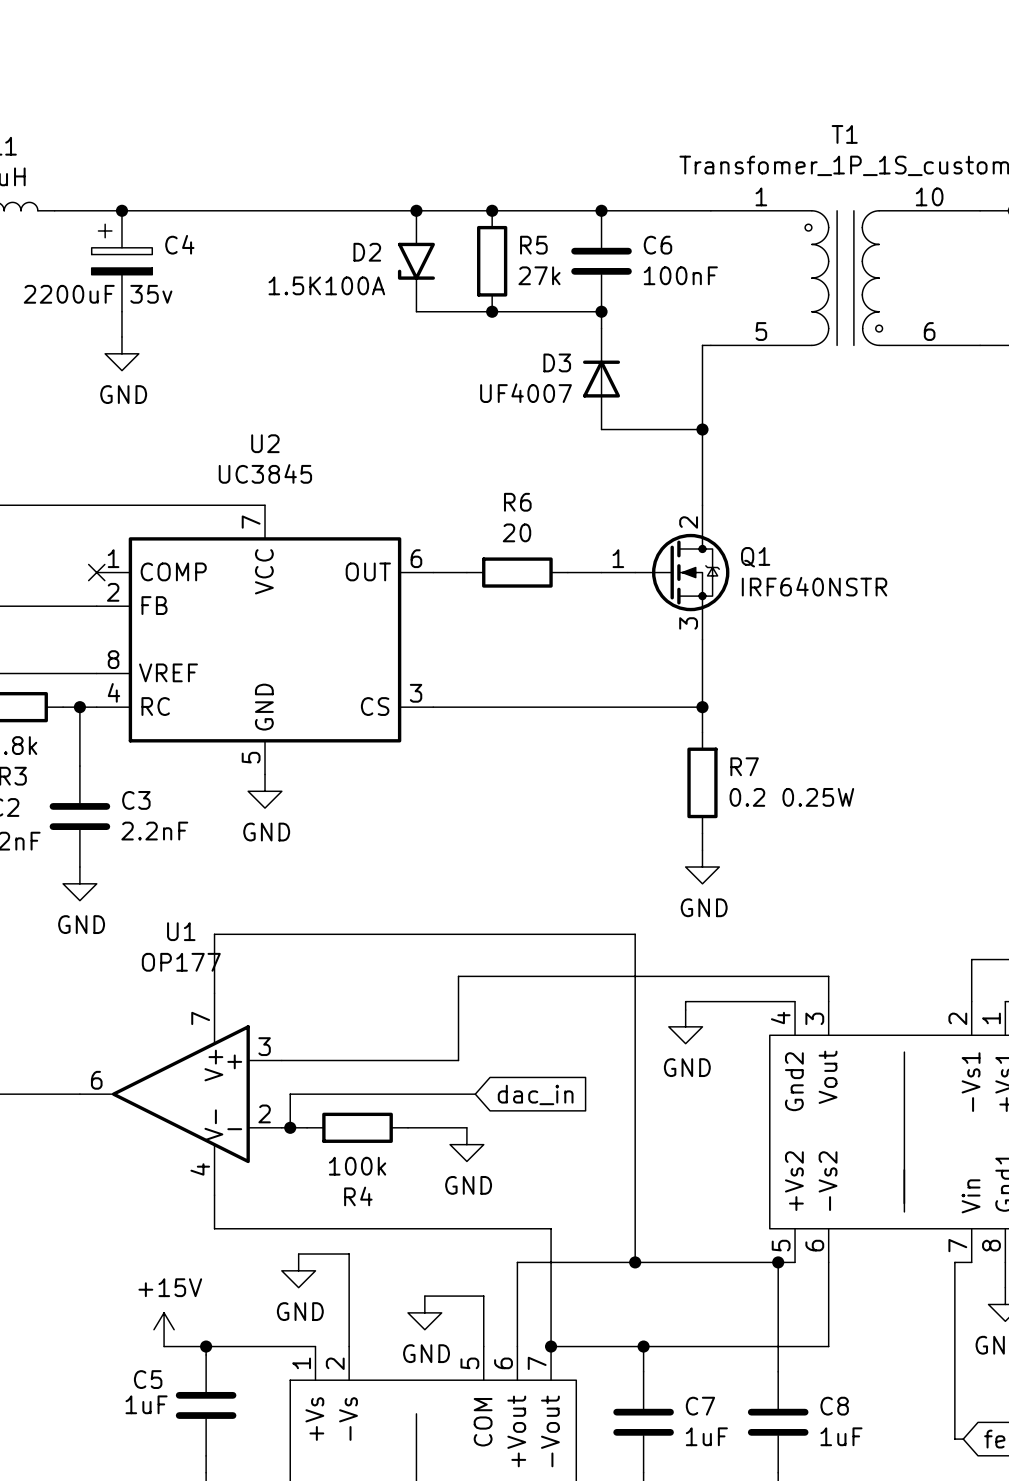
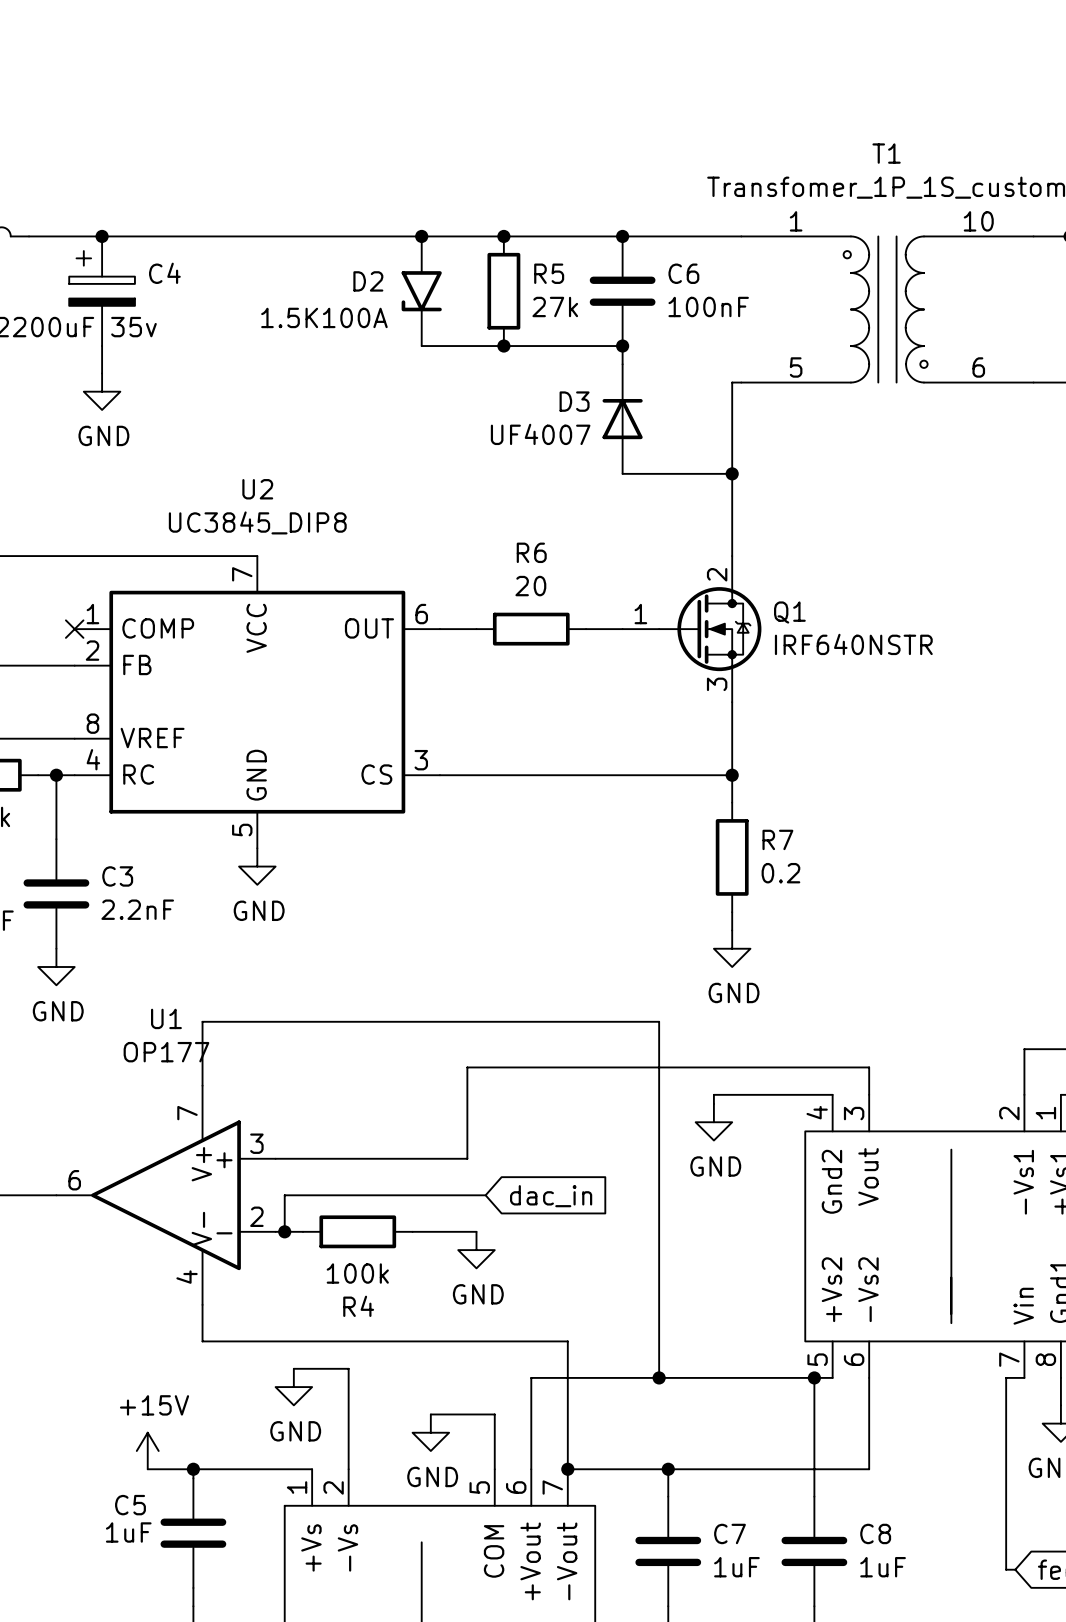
U2 value: UC3845 (265, 473) -> UC3845_DIP8 (257, 522)
R7 value: 0.2 0.25W (791, 797) -> 0.2 (780, 873)

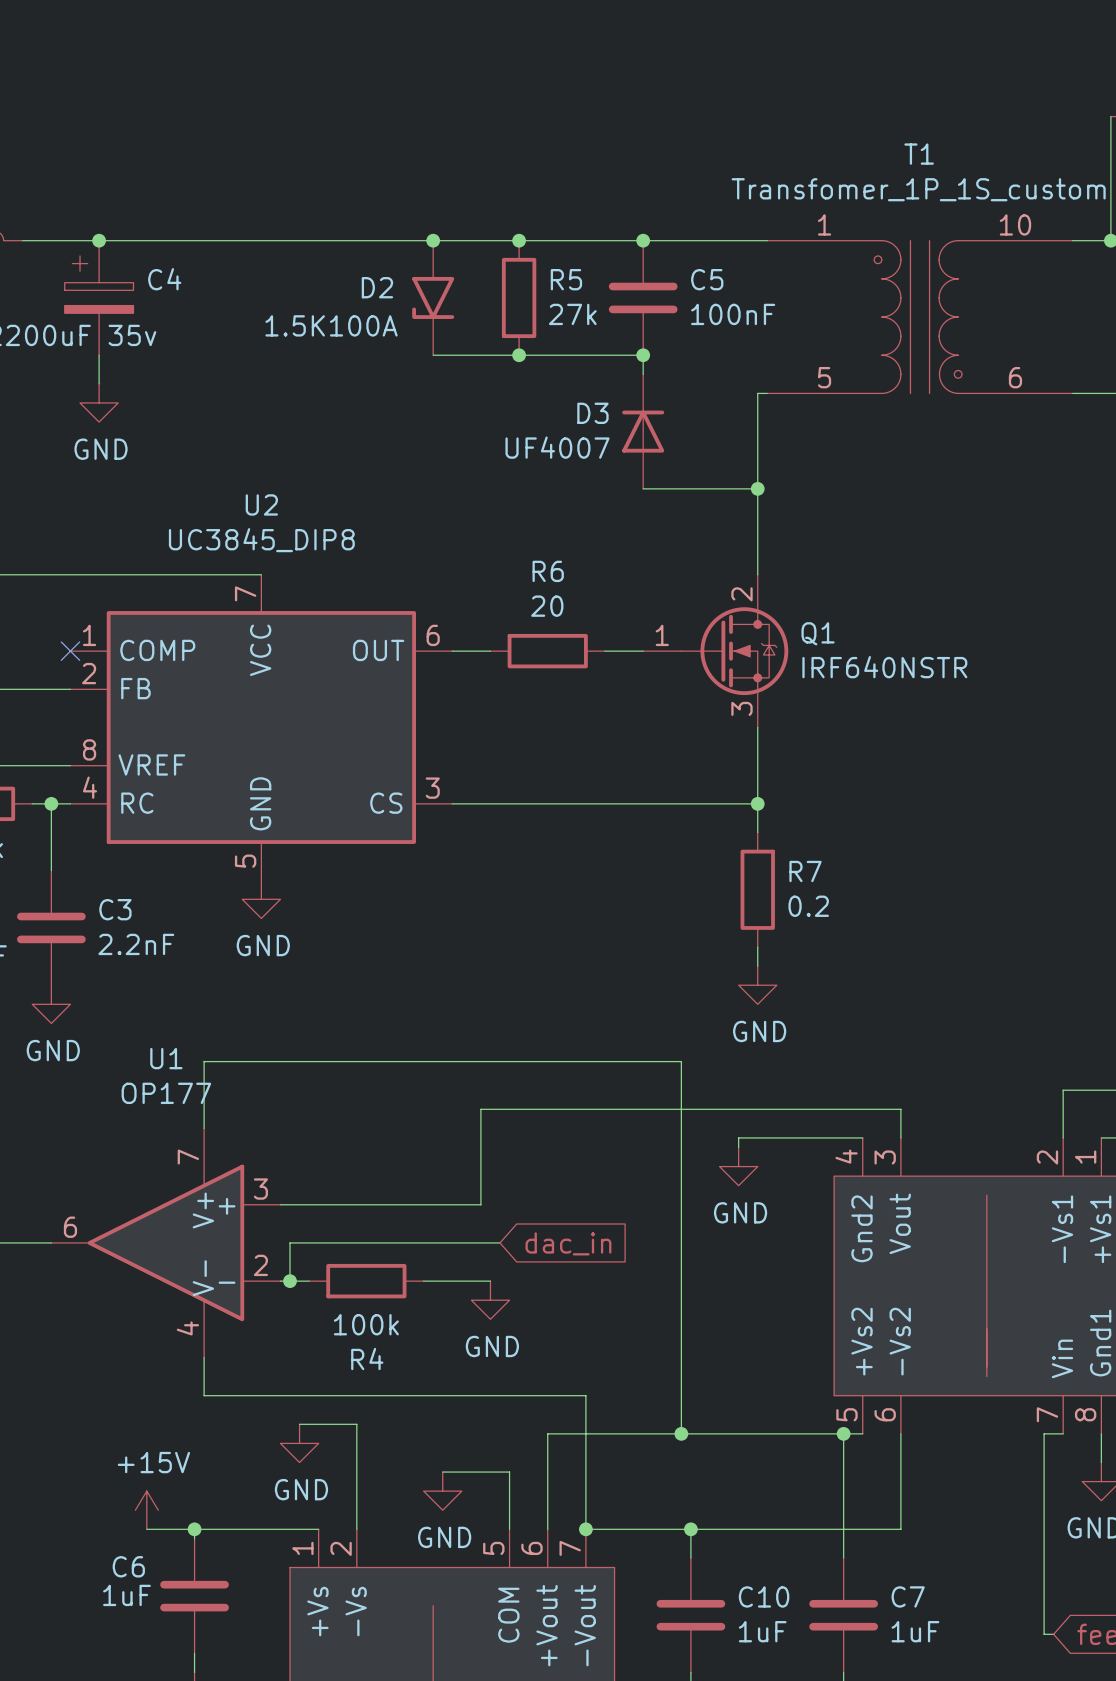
C6 name: C6 (683, 273) -> C5 (707, 279)
C5 name: C5 (130, 1505) -> C6 (128, 1566)
C7 name: C7 (729, 1533) -> C10 (764, 1596)
C8 name: C8 (875, 1533) -> C7 (908, 1596)

